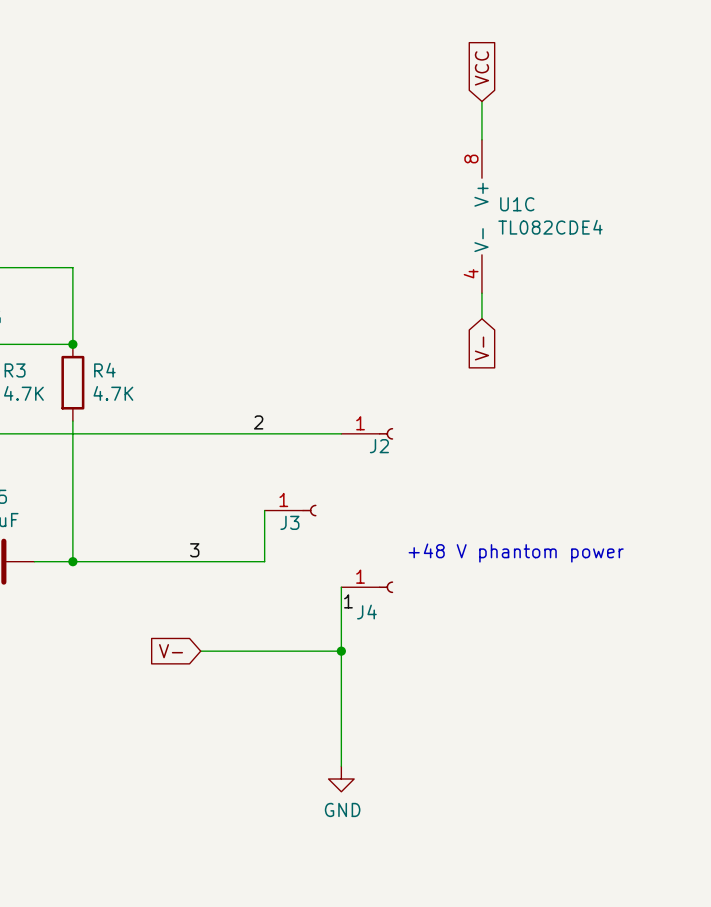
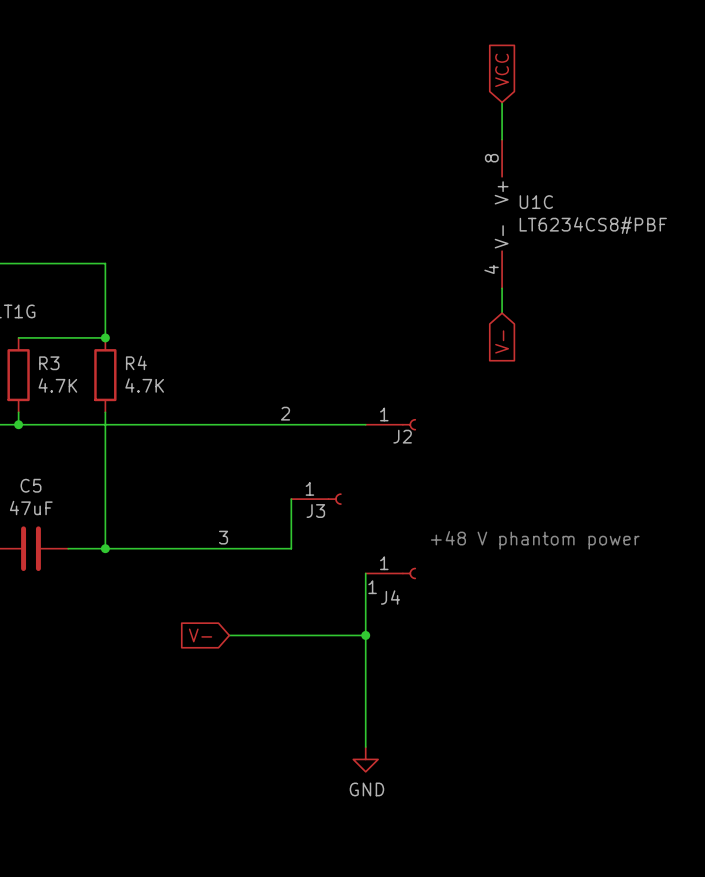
U1C value: TL082CDE4 (550, 227) -> LT6234CS8#PBF (593, 225)

